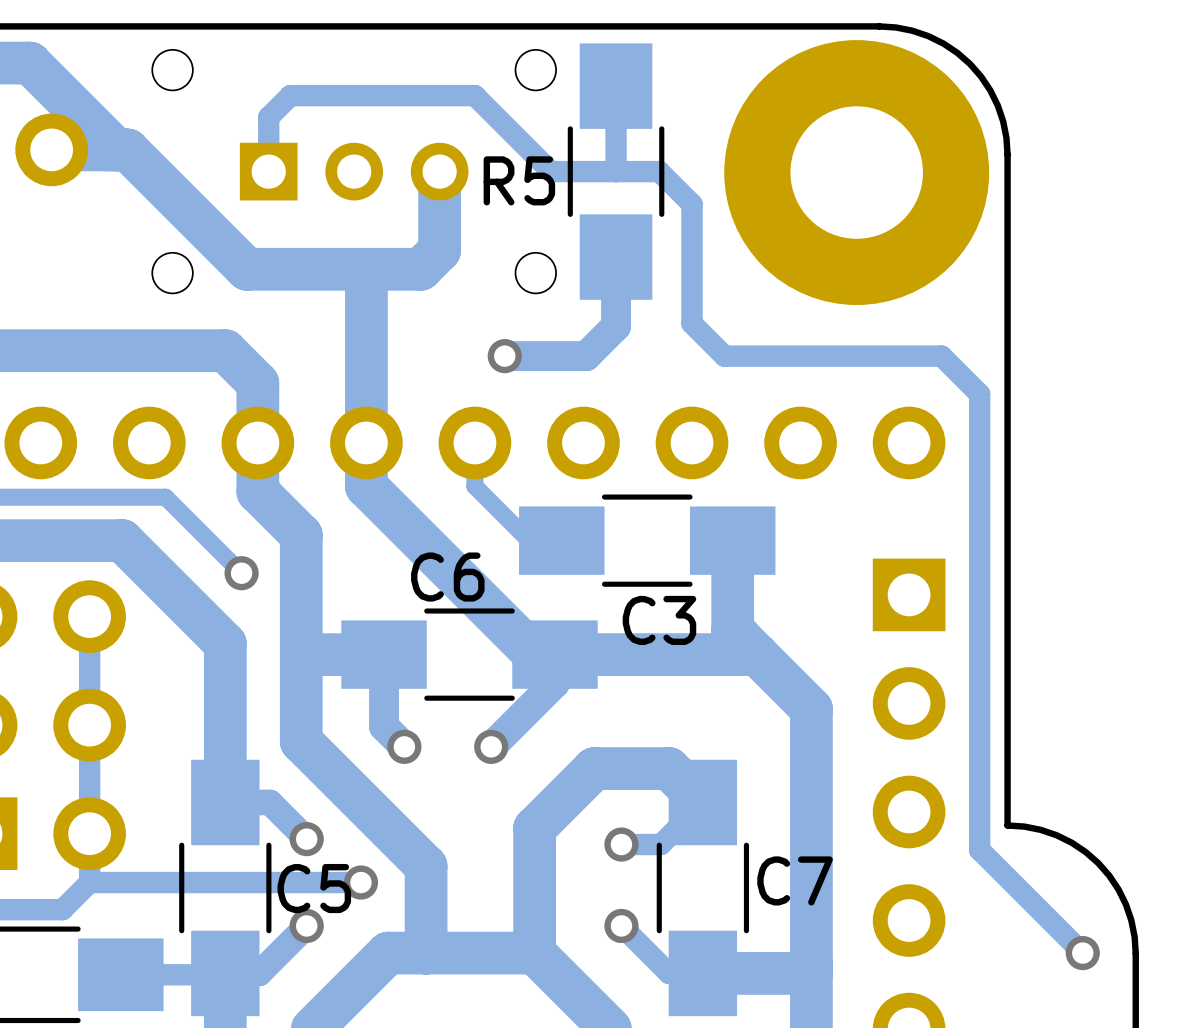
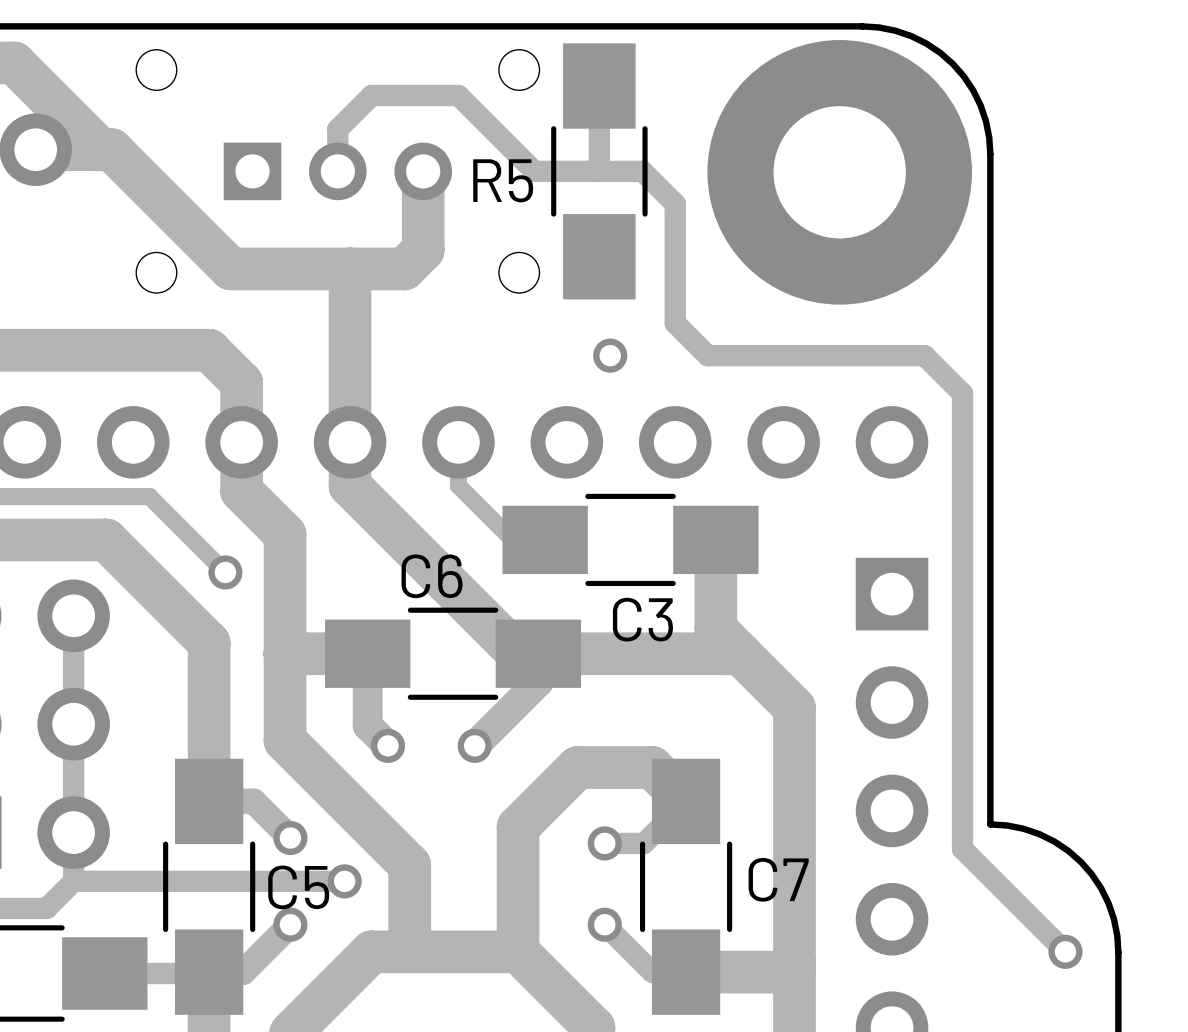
track: (388, 95) (290, 95) (268, 117) (268, 171) -> (371, 95) (337, 129) (337, 171)
track: (616, 257) (616, 326) (586, 356) (504, 356) -> none
via position: (504, 356) -> (610, 355)

